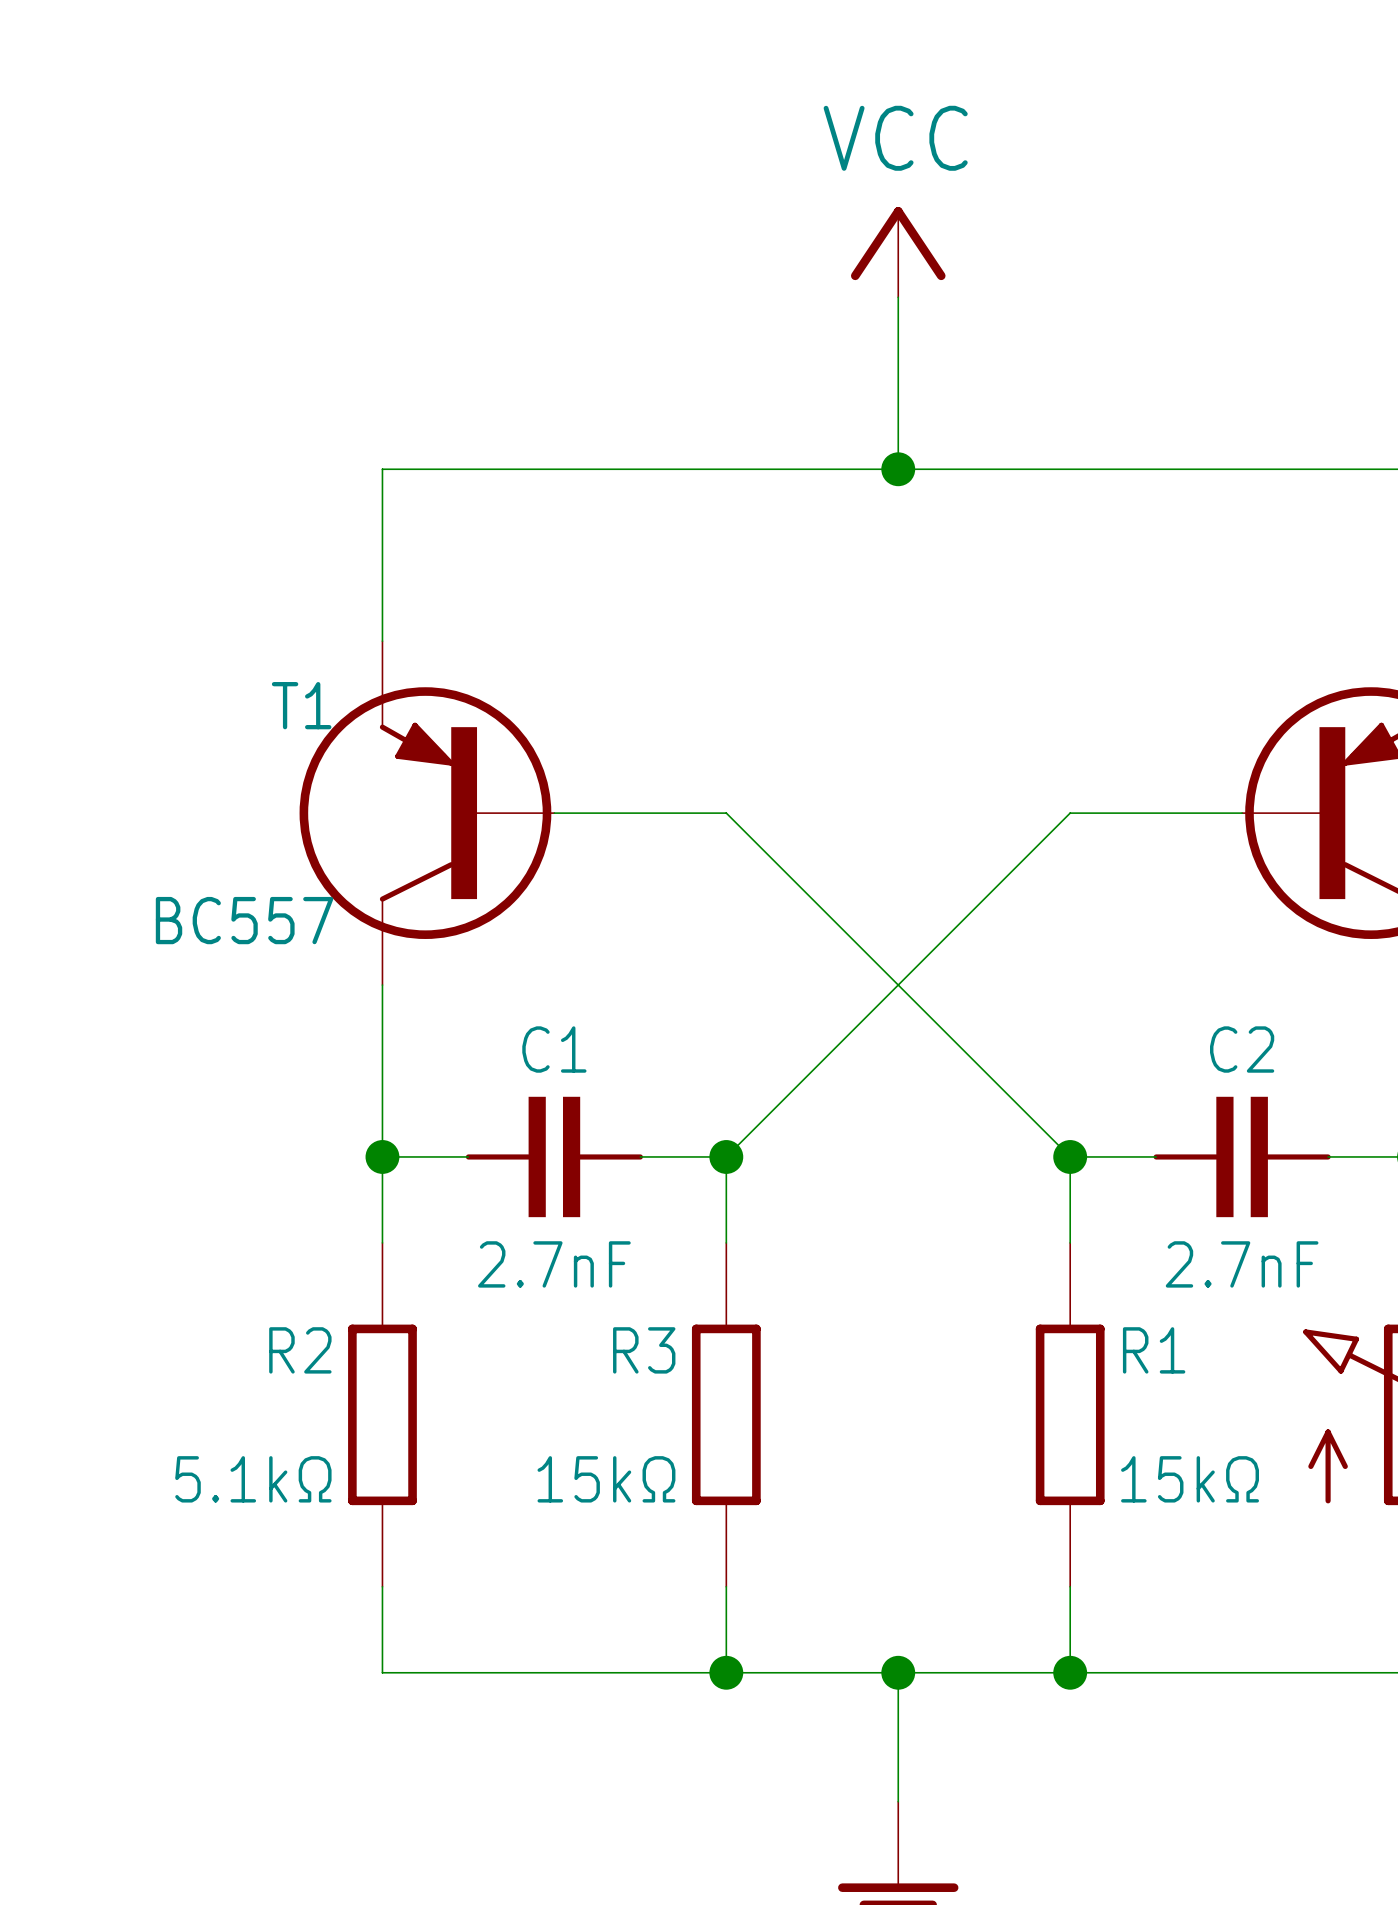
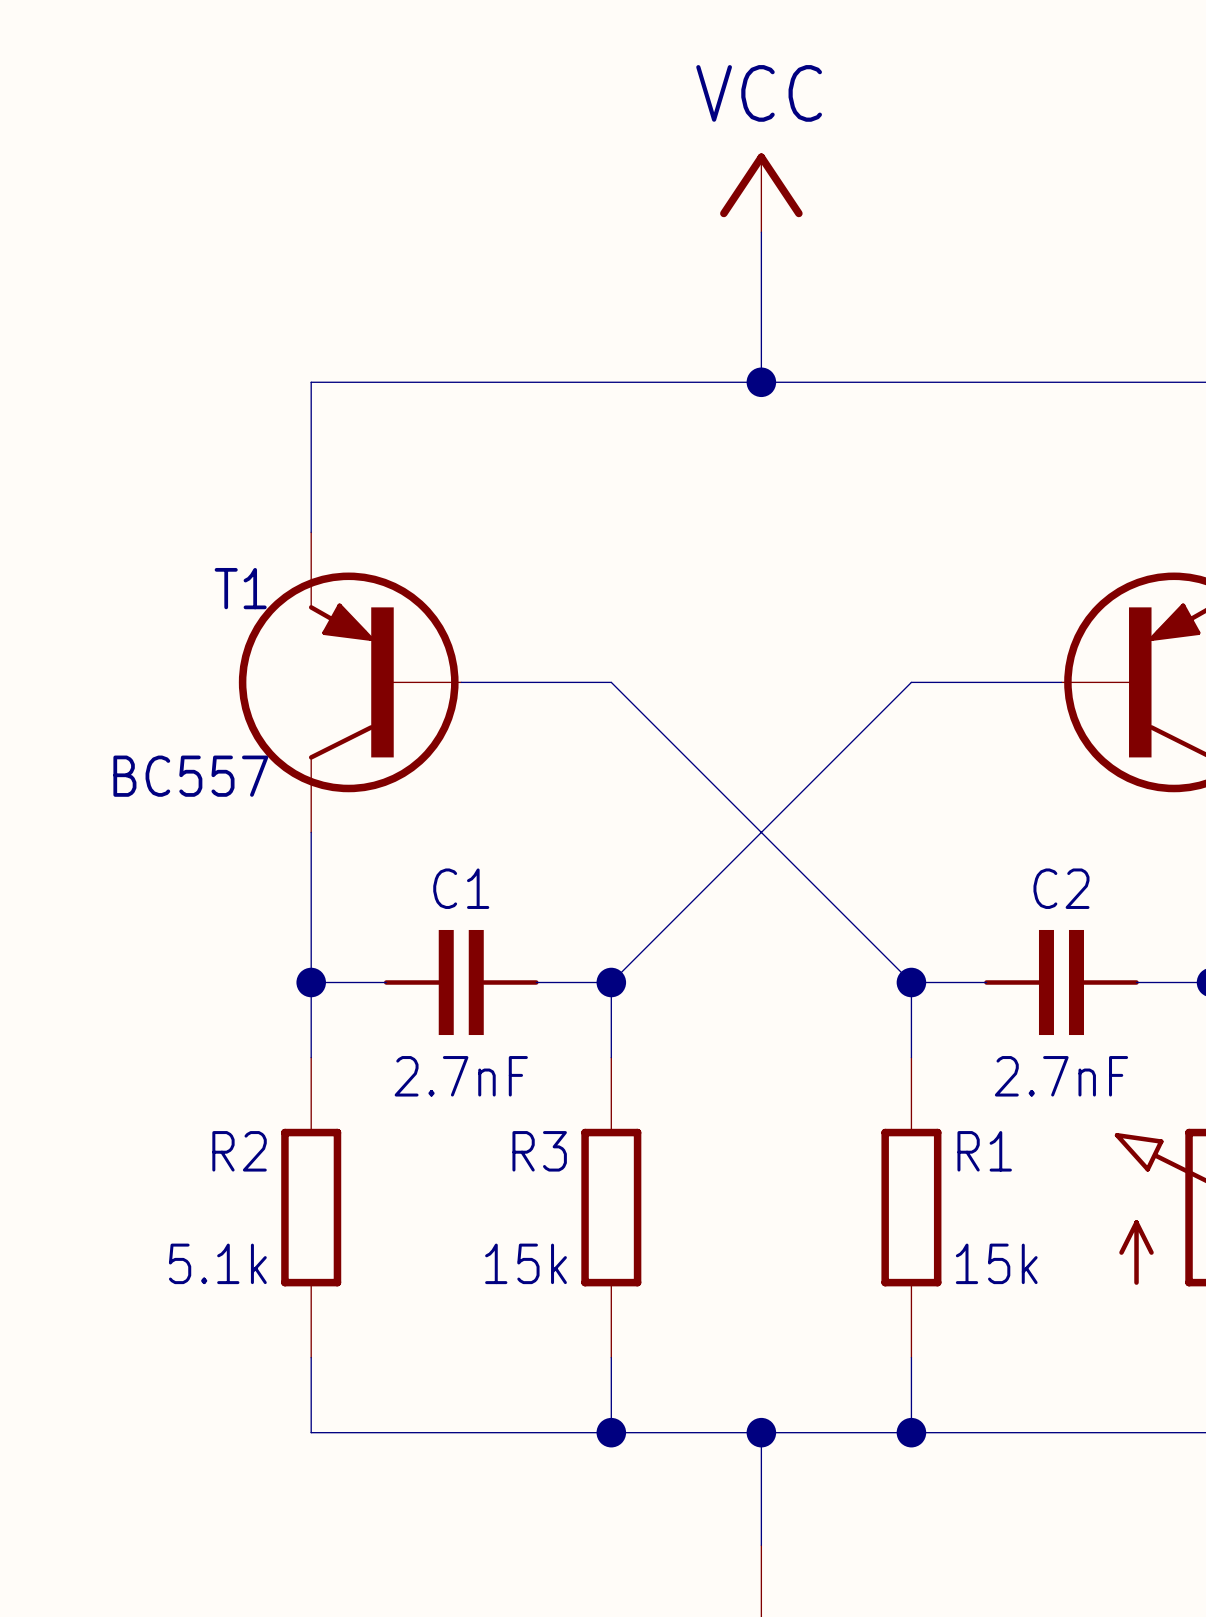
R2 value: 5.1kΩ (253, 1479) -> 5.1k (217, 1263)
R3 value: 15kΩ (606, 1479) -> 15k (526, 1263)
R1 value: 15kΩ (1190, 1479) -> 15k (996, 1263)

